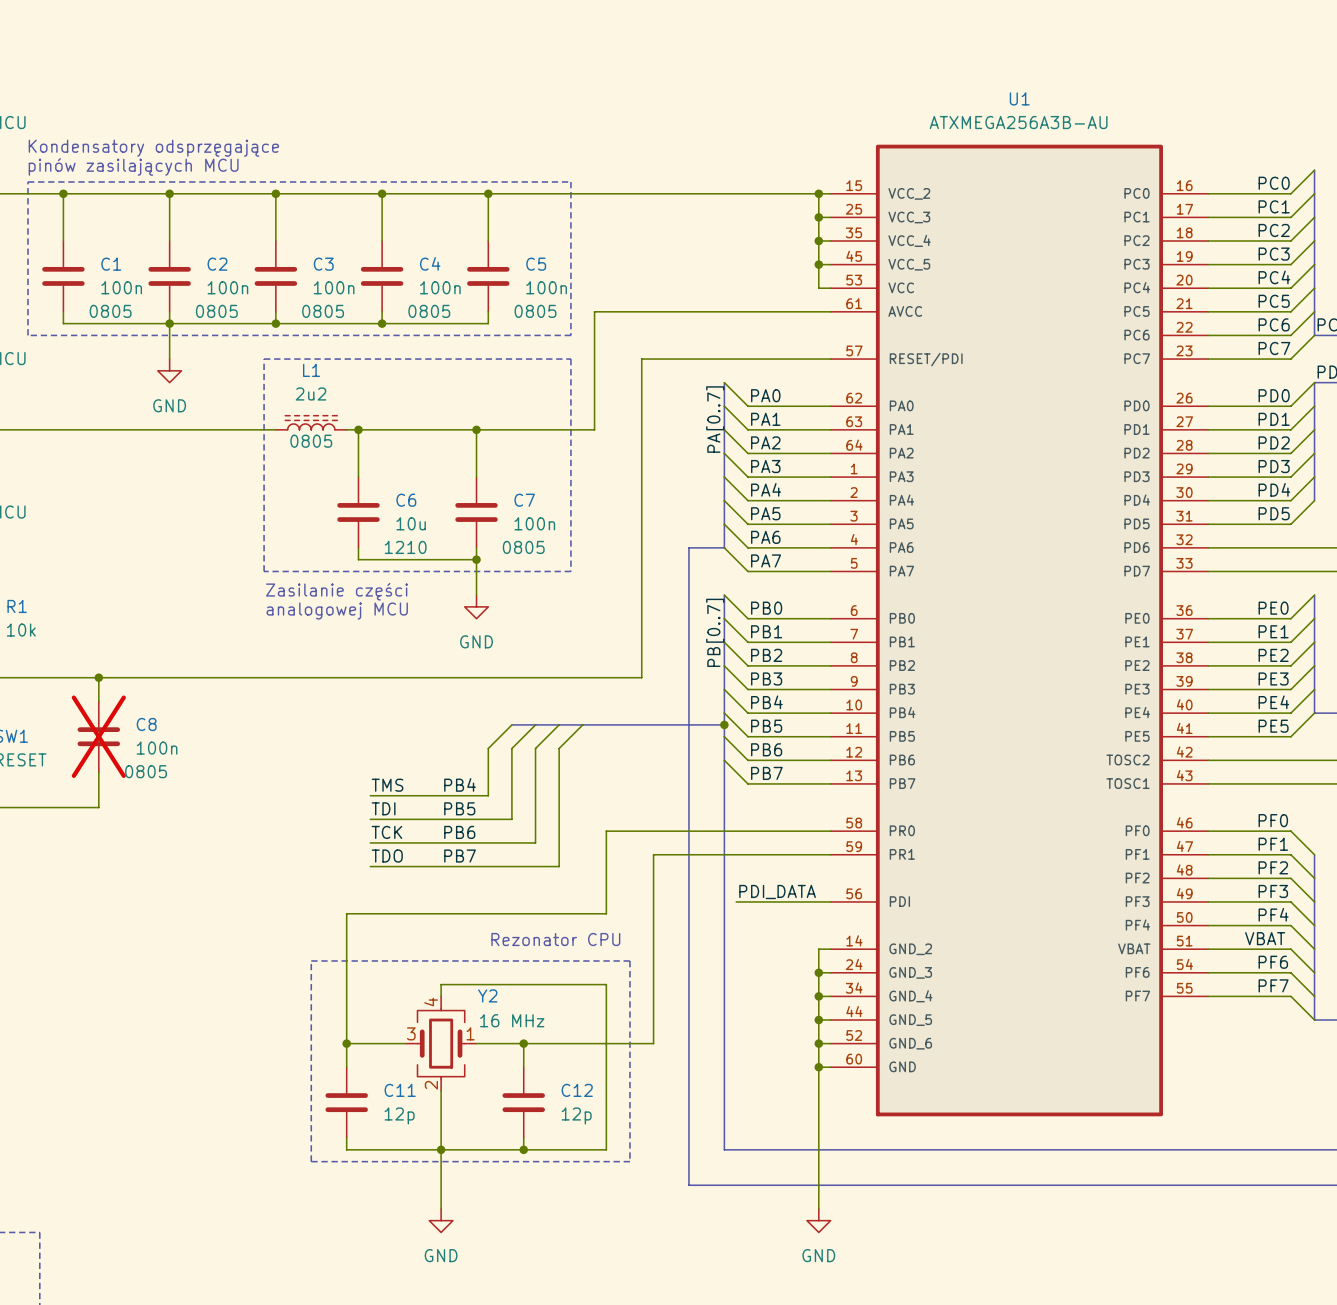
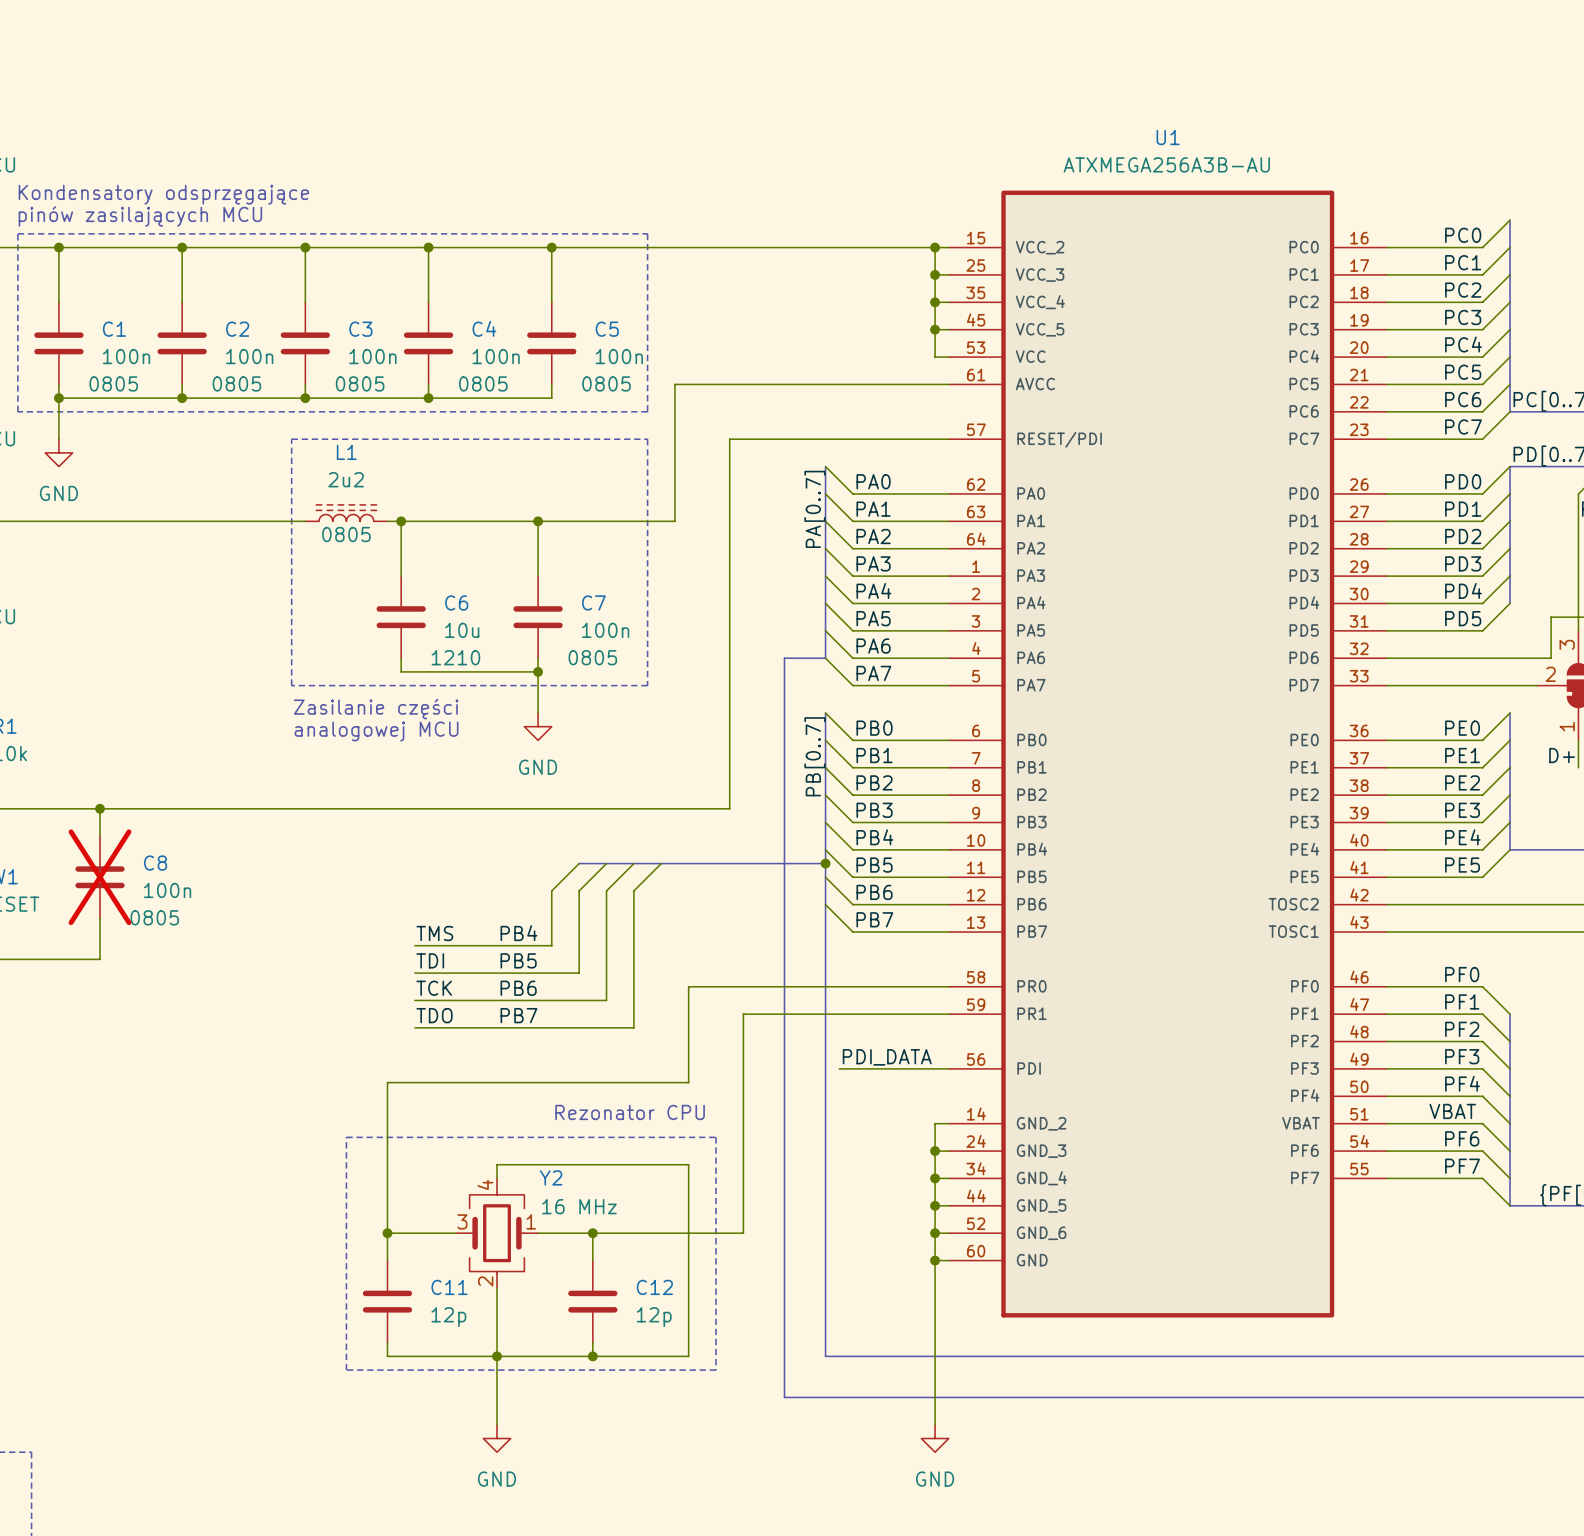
junction: none -> (58, 398)
wire: (169, 323) (169, 359) -> (58, 398) (58, 439)
power symbol position: GND (169, 370) -> GND (58, 452)

